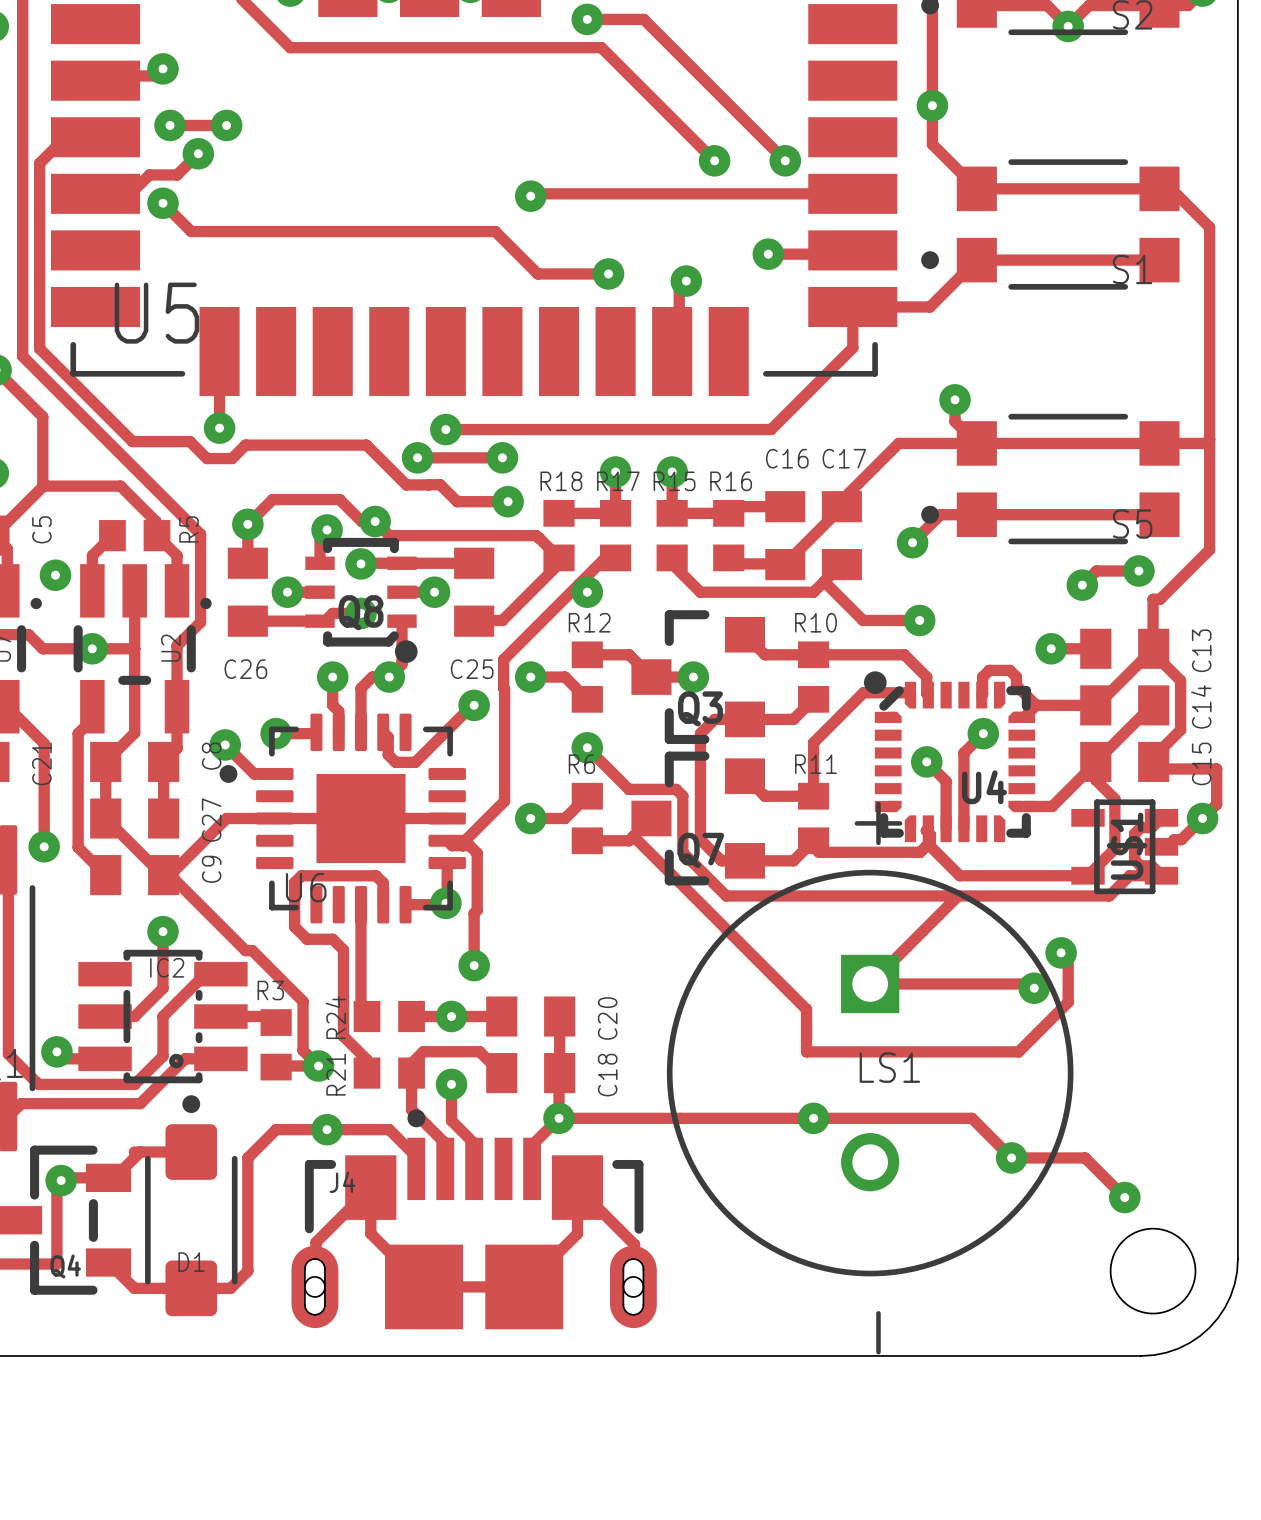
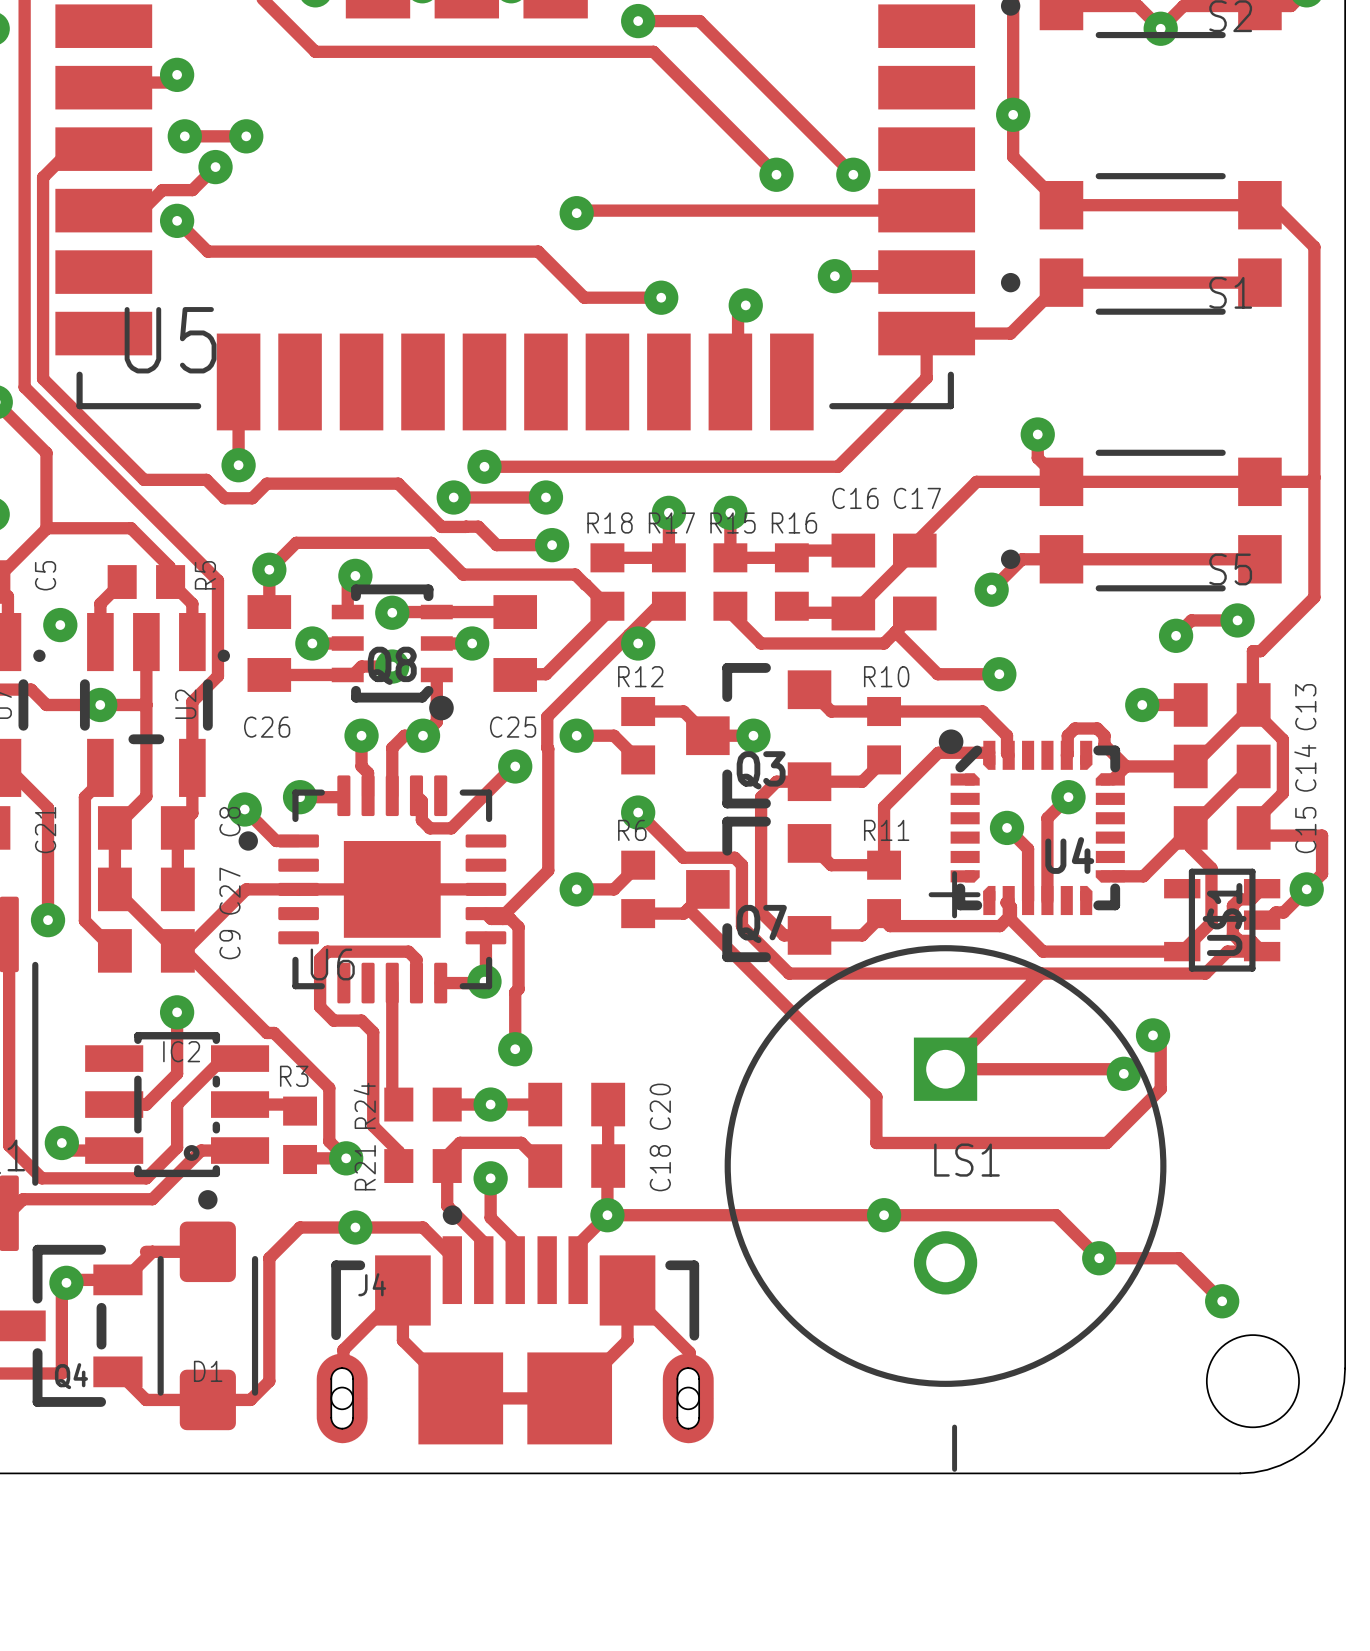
track: (339, 499) (361, 521) (375, 521) (389, 535) (536, 535) -> (369, 542) (431, 542) (463, 574) (575, 574) (582, 582)
via: (375, 521) -> none

